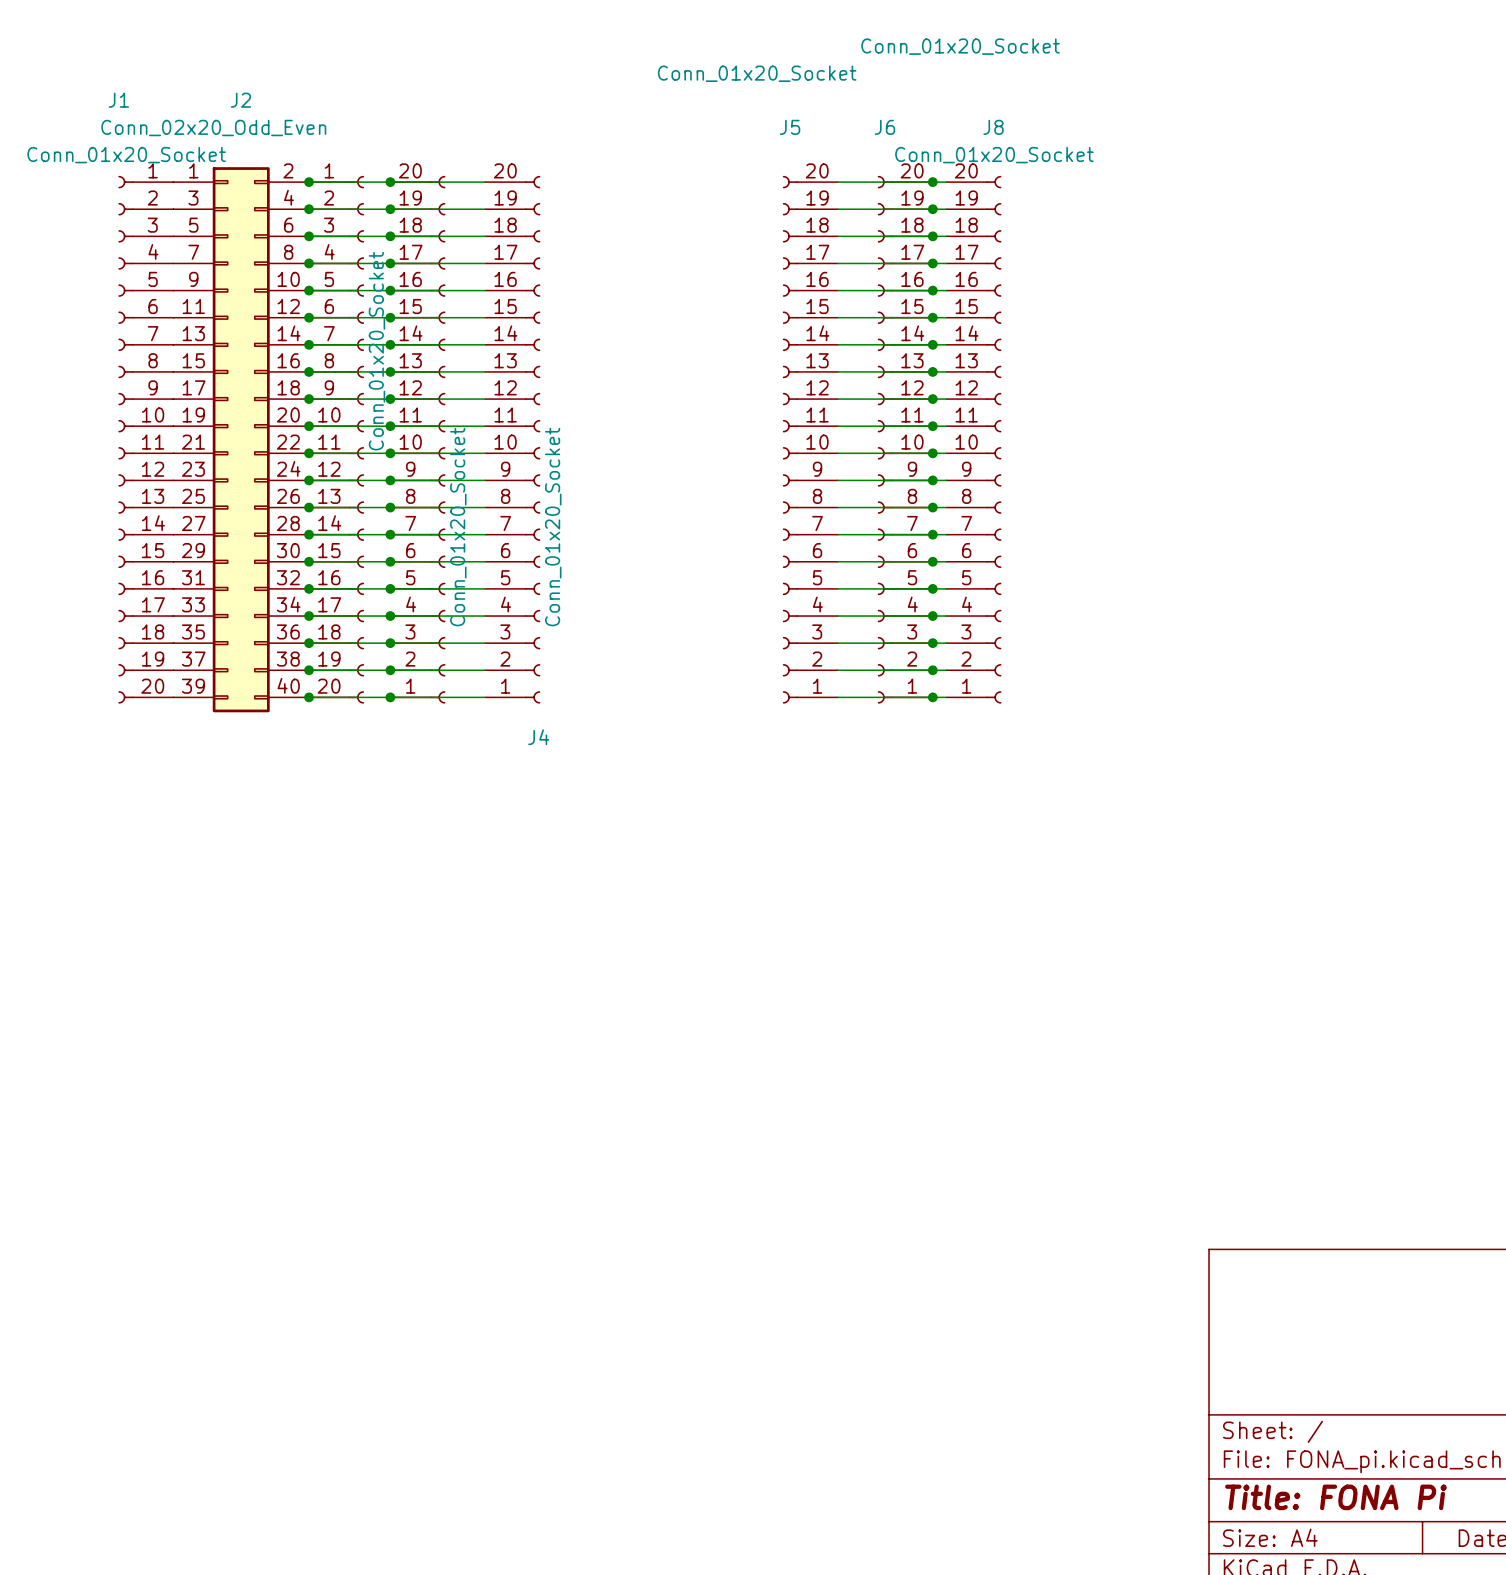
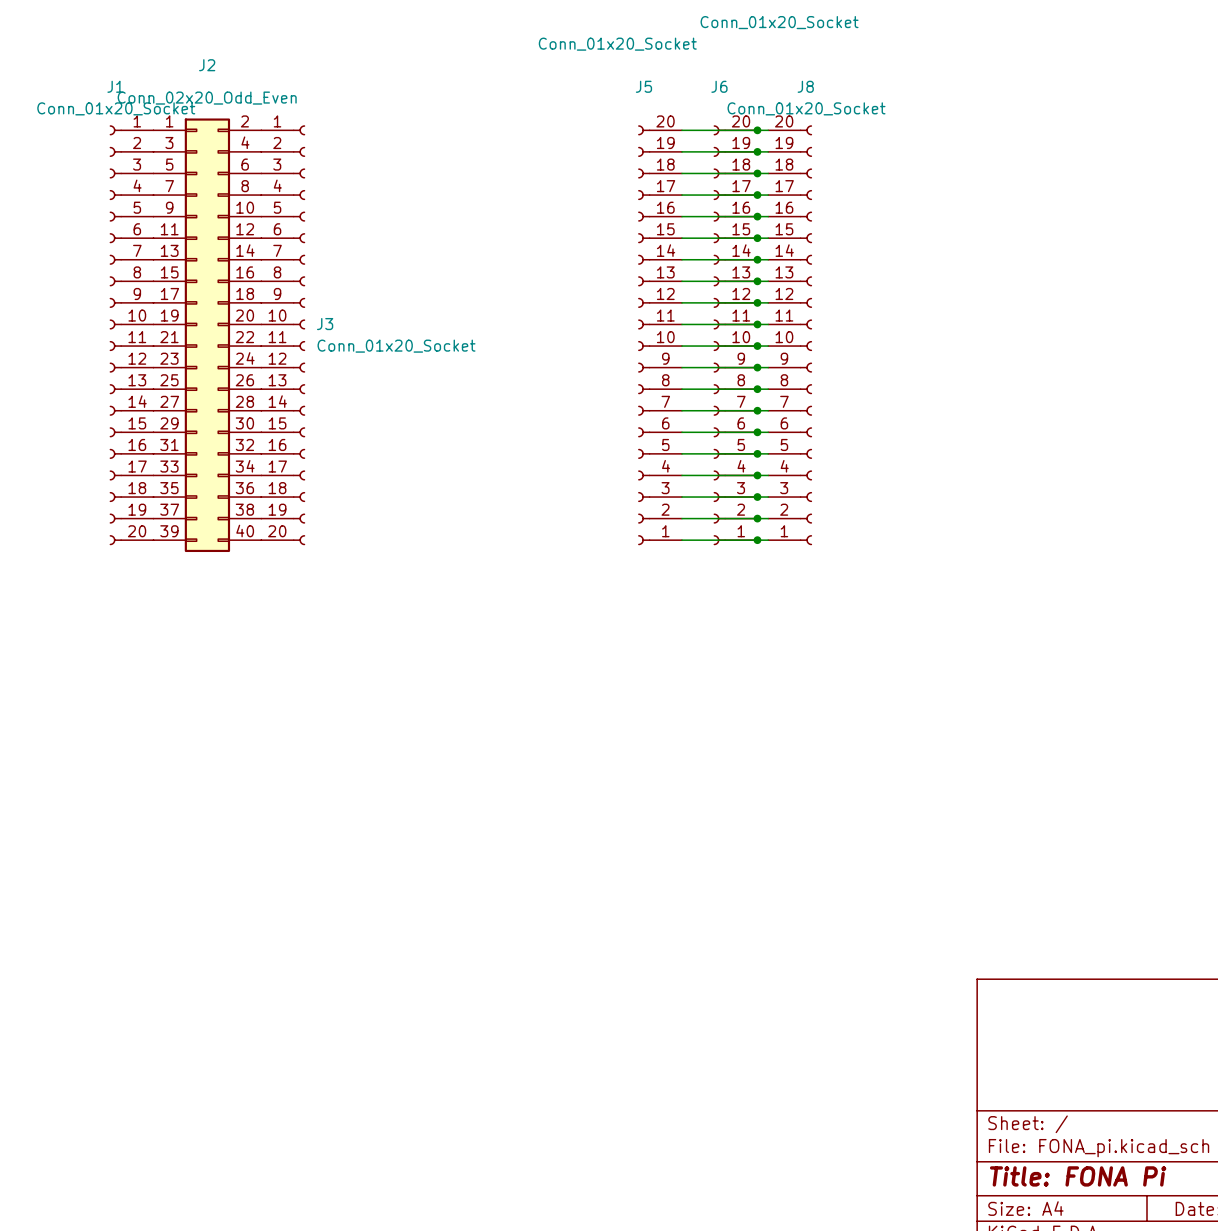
J1 name position: J1 (118, 100) -> J1 (115, 86)
J2 value position: Conn_02x20_Odd_Even (213, 127) -> Conn_02x20_Odd_Even (207, 98)
wire: (309, 182) (485, 182) -> none
junction: (309, 182) -> none
junction: (390, 182) -> none
wire: (309, 209) (485, 209) -> none
junction: (309, 209) -> none
junction: (390, 209) -> none
wire: (309, 236) (485, 236) -> none
junction: (309, 236) -> none
junction: (390, 236) -> none
wire: (309, 263) (485, 263) -> none
junction: (309, 263) -> none
junction: (390, 263) -> none
wire: (309, 290) (485, 290) -> none
junction: (309, 290) -> none
junction: (390, 290) -> none
wire: (309, 317) (485, 317) -> none
junction: (309, 317) -> none
junction: (390, 317) -> none
wire: (309, 344) (485, 344) -> none
junction: (309, 344) -> none
junction: (390, 344) -> none
J3 value rotation: 0° (376, 351) -> 90° clockwise (396, 346)
wire: (309, 371) (485, 371) -> none
junction: (309, 371) -> none
junction: (390, 371) -> none
wire: (309, 399) (485, 399) -> none
junction: (309, 399) -> none
junction: (390, 399) -> none
J3 name: none -> J3 (325, 324)
wire: (309, 426) (485, 426) -> none
junction: (309, 426) -> none
junction: (390, 426) -> none
part: Conn_01x20_Socket (417, 439) -> none
J4: Conn_01x20_Socket (512, 439) -> none
wire: (309, 453) (485, 453) -> none
junction: (309, 453) -> none
junction: (390, 453) -> none
wire: (309, 480) (485, 480) -> none
junction: (309, 480) -> none
junction: (390, 480) -> none
wire: (309, 507) (485, 507) -> none
junction: (309, 507) -> none
junction: (390, 507) -> none
wire: (309, 534) (485, 534) -> none
junction: (309, 534) -> none
junction: (390, 534) -> none
wire: (309, 561) (485, 561) -> none
junction: (309, 561) -> none
junction: (390, 561) -> none
wire: (309, 588) (485, 588) -> none
junction: (309, 588) -> none
junction: (390, 588) -> none
wire: (309, 616) (485, 616) -> none
junction: (309, 616) -> none
junction: (390, 616) -> none
wire: (309, 643) (485, 643) -> none
junction: (309, 643) -> none
junction: (390, 643) -> none
wire: (309, 670) (485, 670) -> none
junction: (309, 670) -> none
junction: (390, 670) -> none
wire: (309, 697) (485, 697) -> none
junction: (309, 697) -> none
junction: (390, 697) -> none

